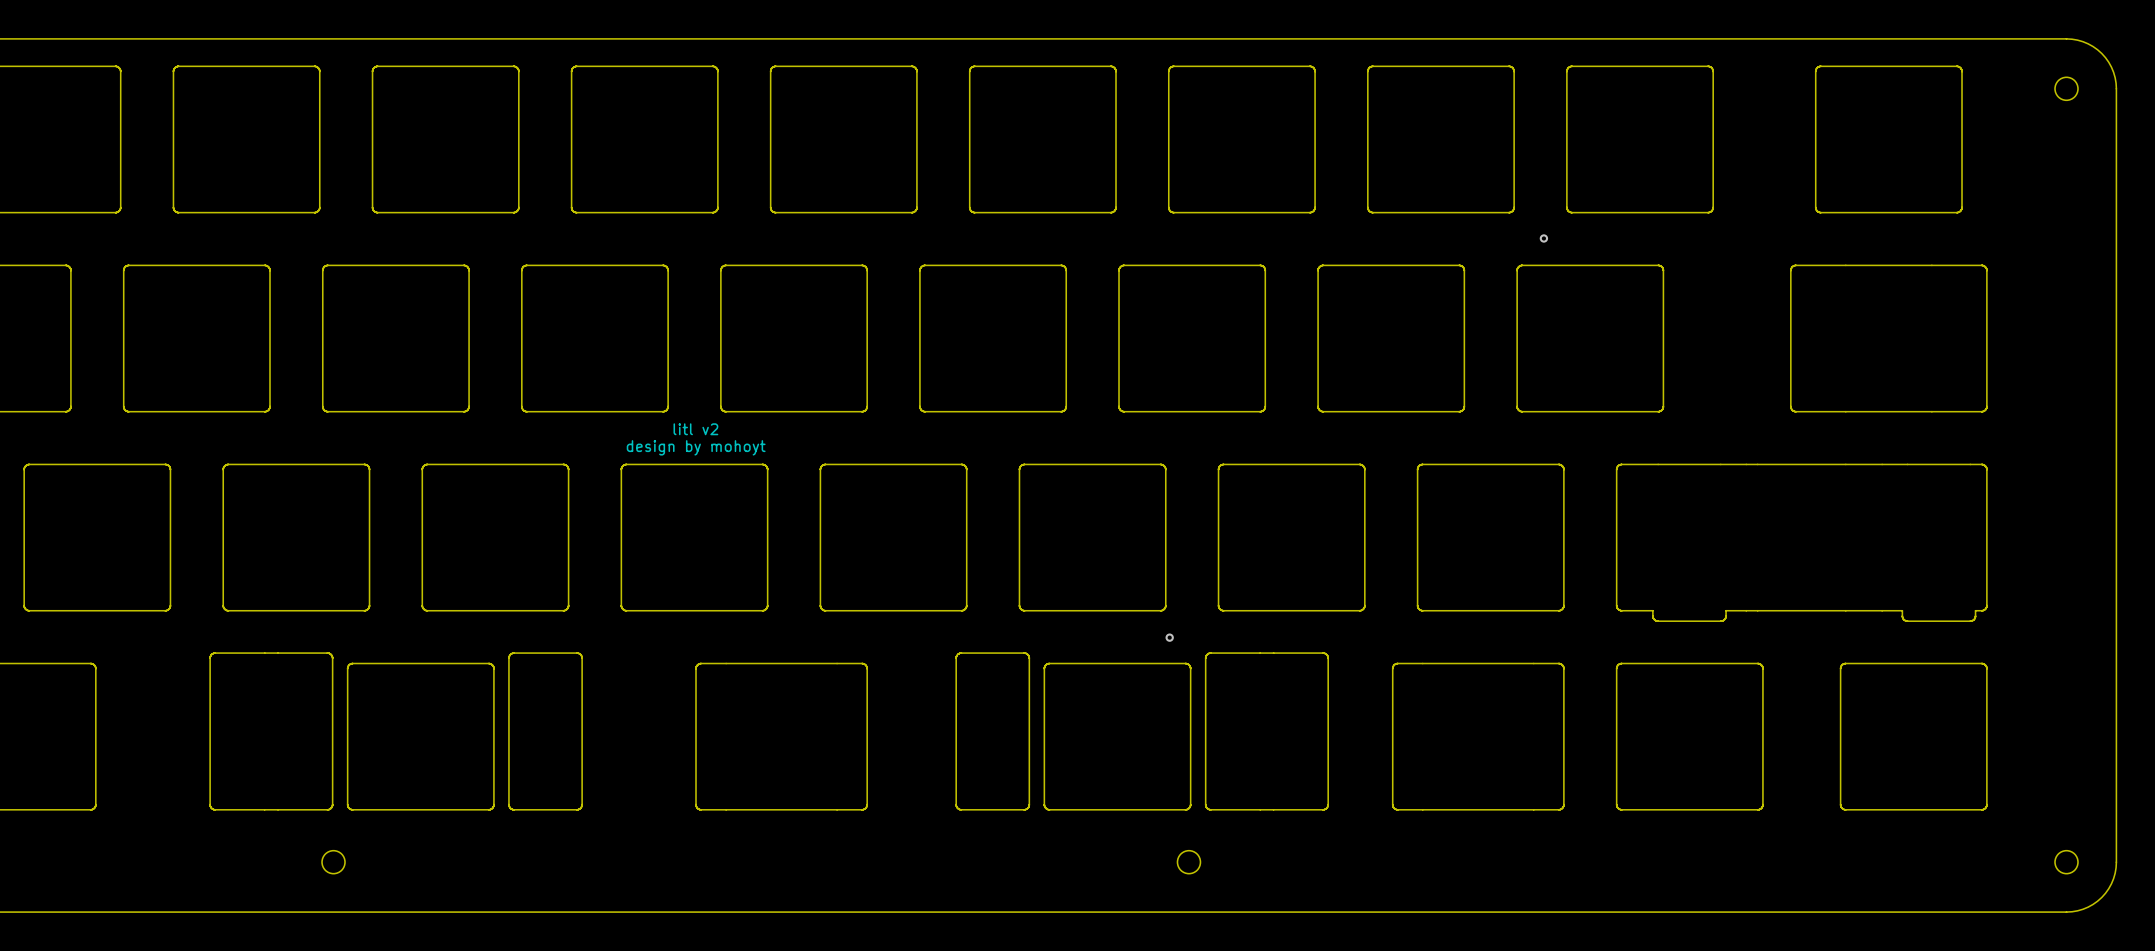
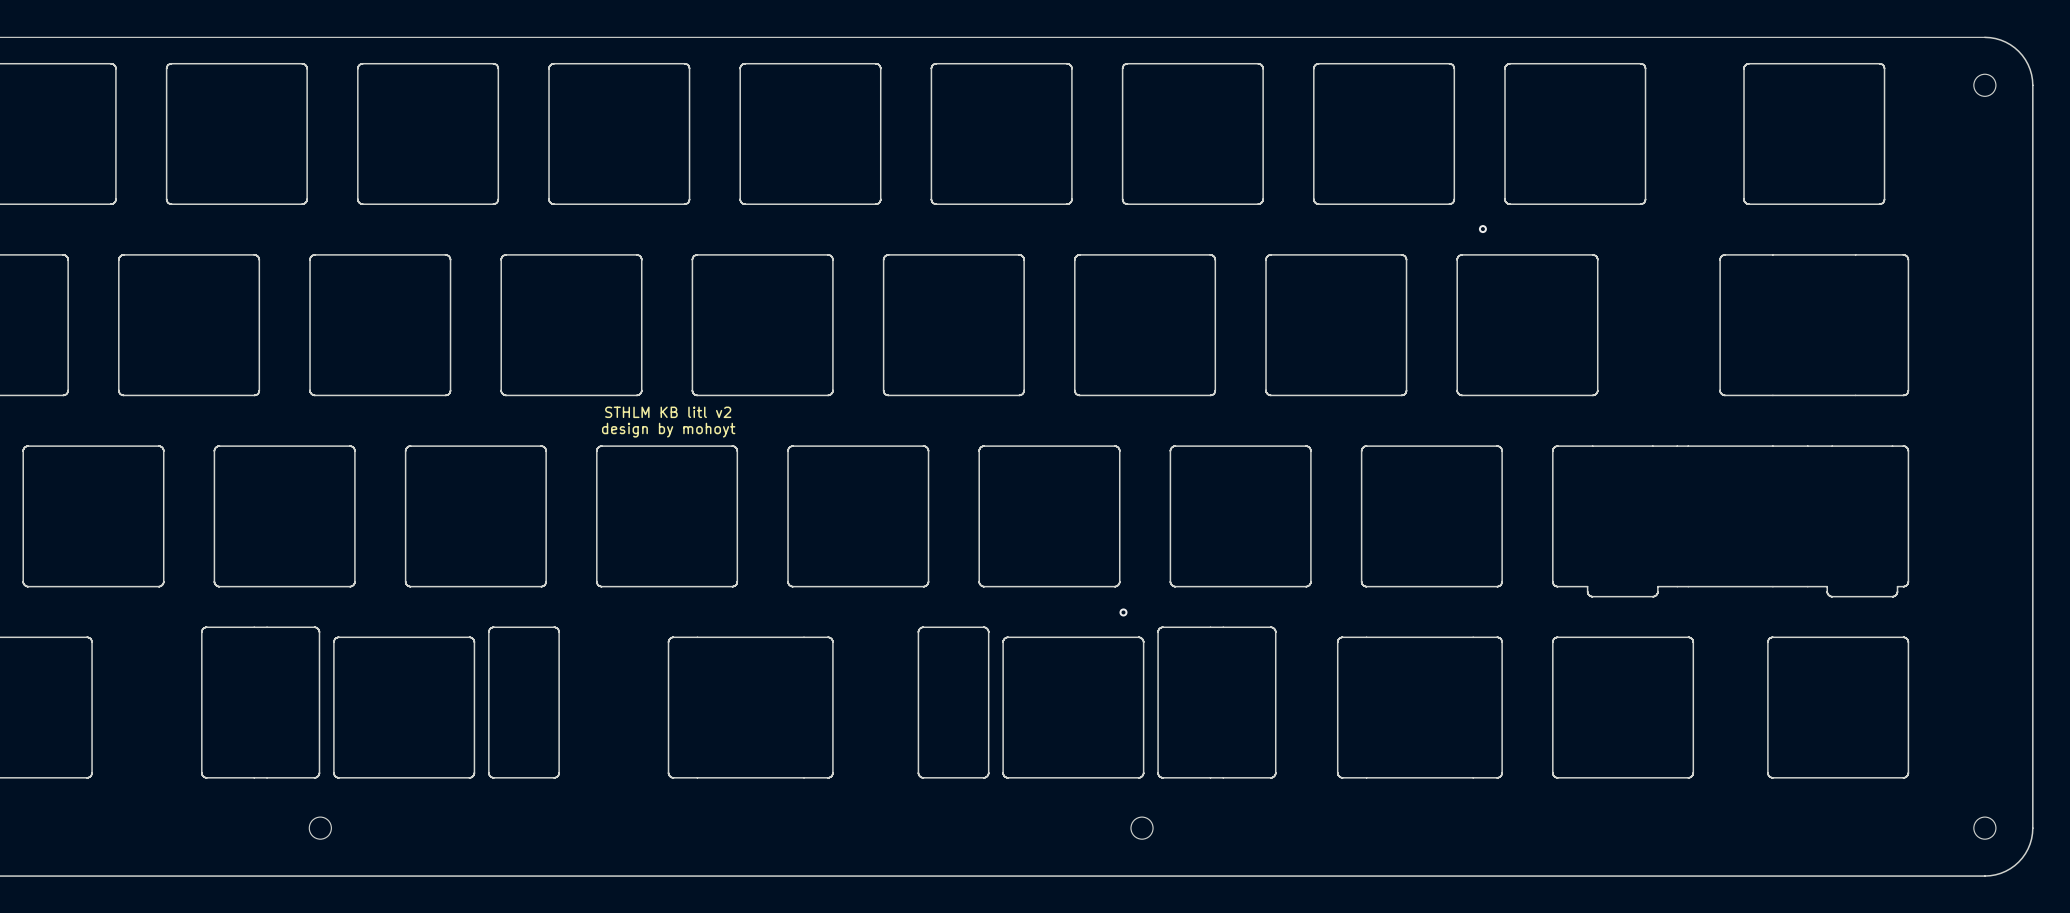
text: litl v2 (695, 429) -> STHLM KB litl v2 (668, 412)

